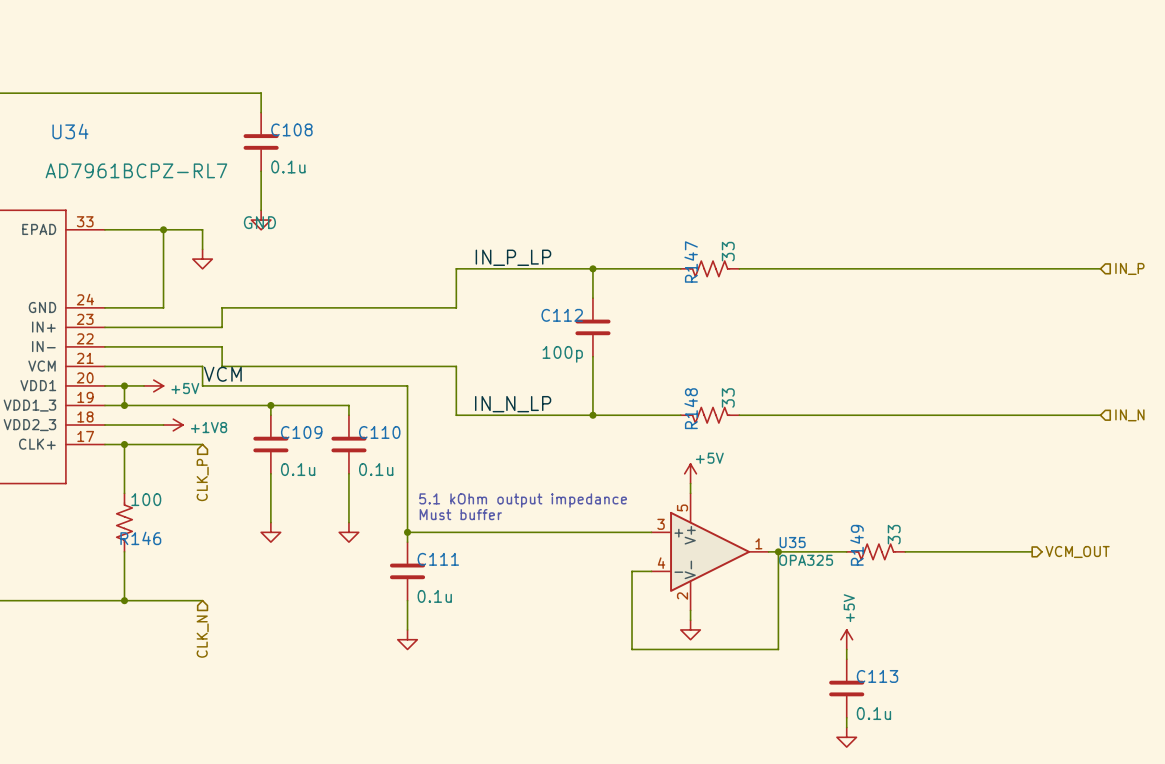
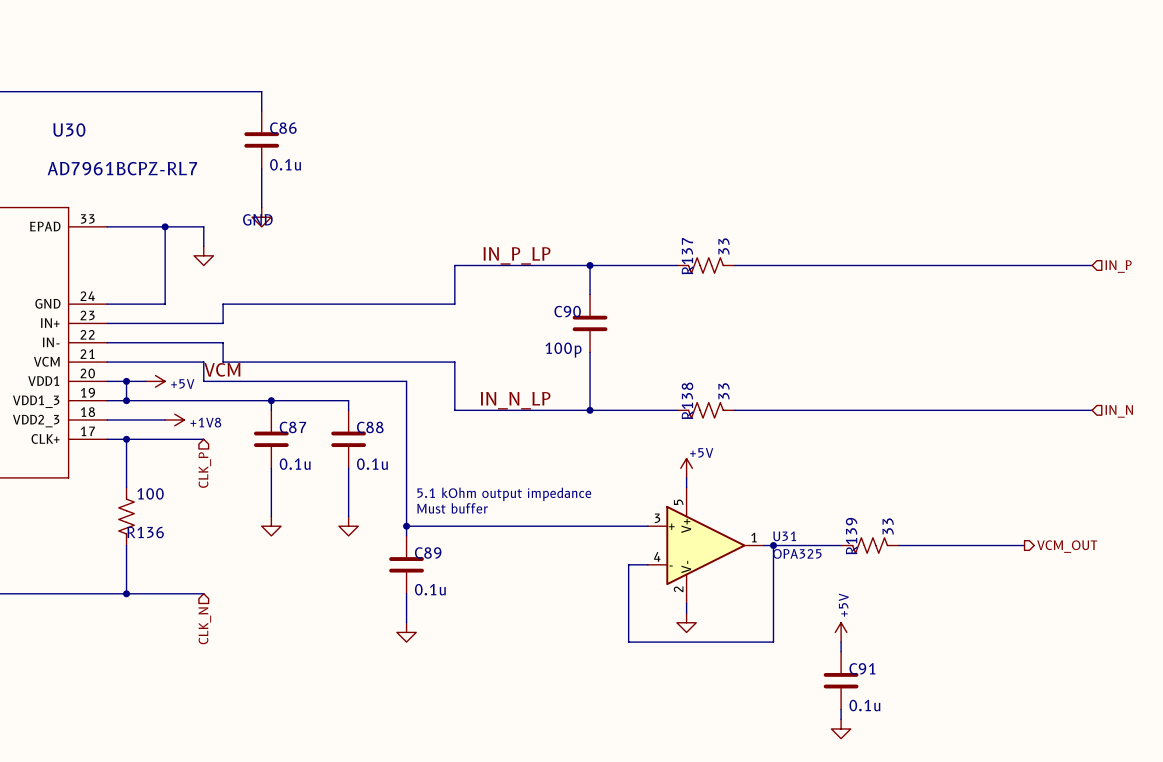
C108 name: C108 (291, 129) -> C86 (283, 128)
U34 name: U34 (70, 131) -> U30 (69, 130)
R147 name: R147 (691, 261) -> R137 (687, 256)
C112 name: C112 (562, 315) -> C90 (567, 311)
R148 name: R148 (691, 408) -> R138 (687, 400)
C109 name: C109 (301, 432) -> C87 (292, 427)
C110 name: C110 (379, 432) -> C88 (370, 427)
R146 name: R146 (140, 538) -> R136 (145, 532)
U35 name: U35 (792, 542) -> U31 (784, 536)
R149 name: R149 (857, 545) -> R139 (851, 536)
C111 name: C111 (438, 559) -> C89 (428, 552)
C113 name: C113 (877, 676) -> C91 (862, 668)

